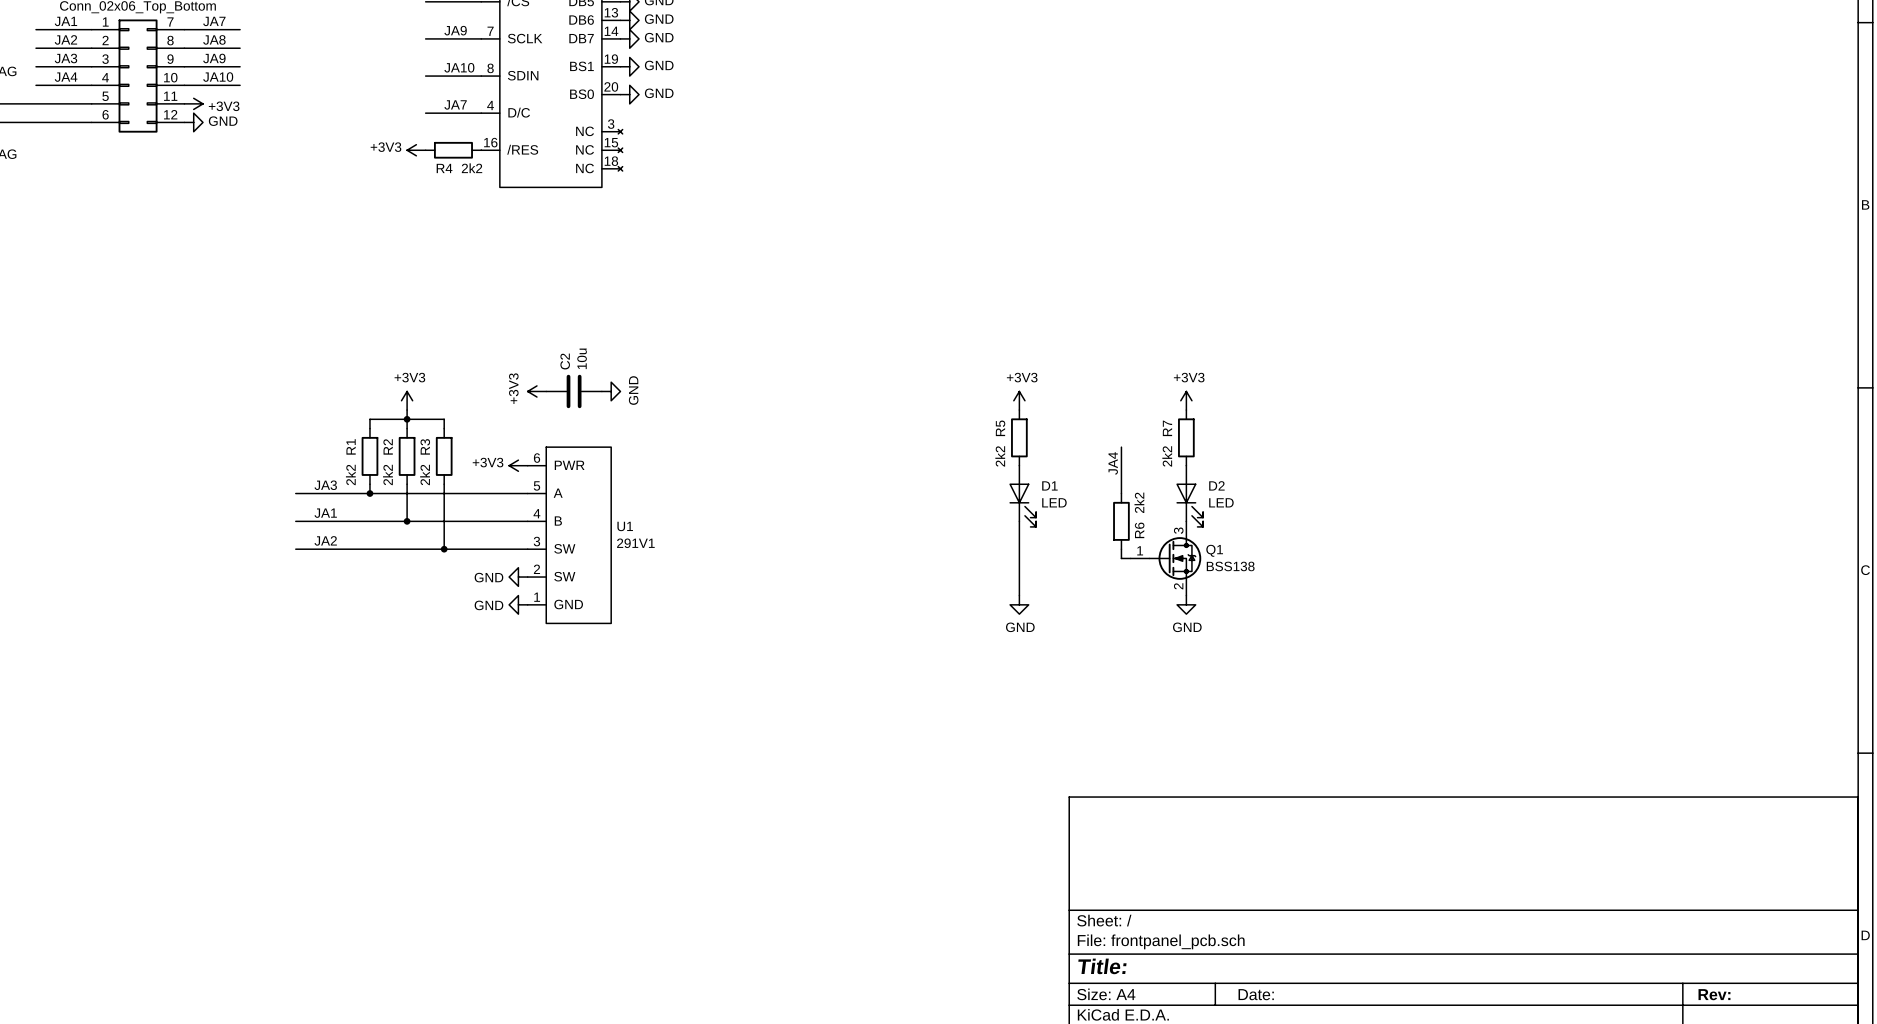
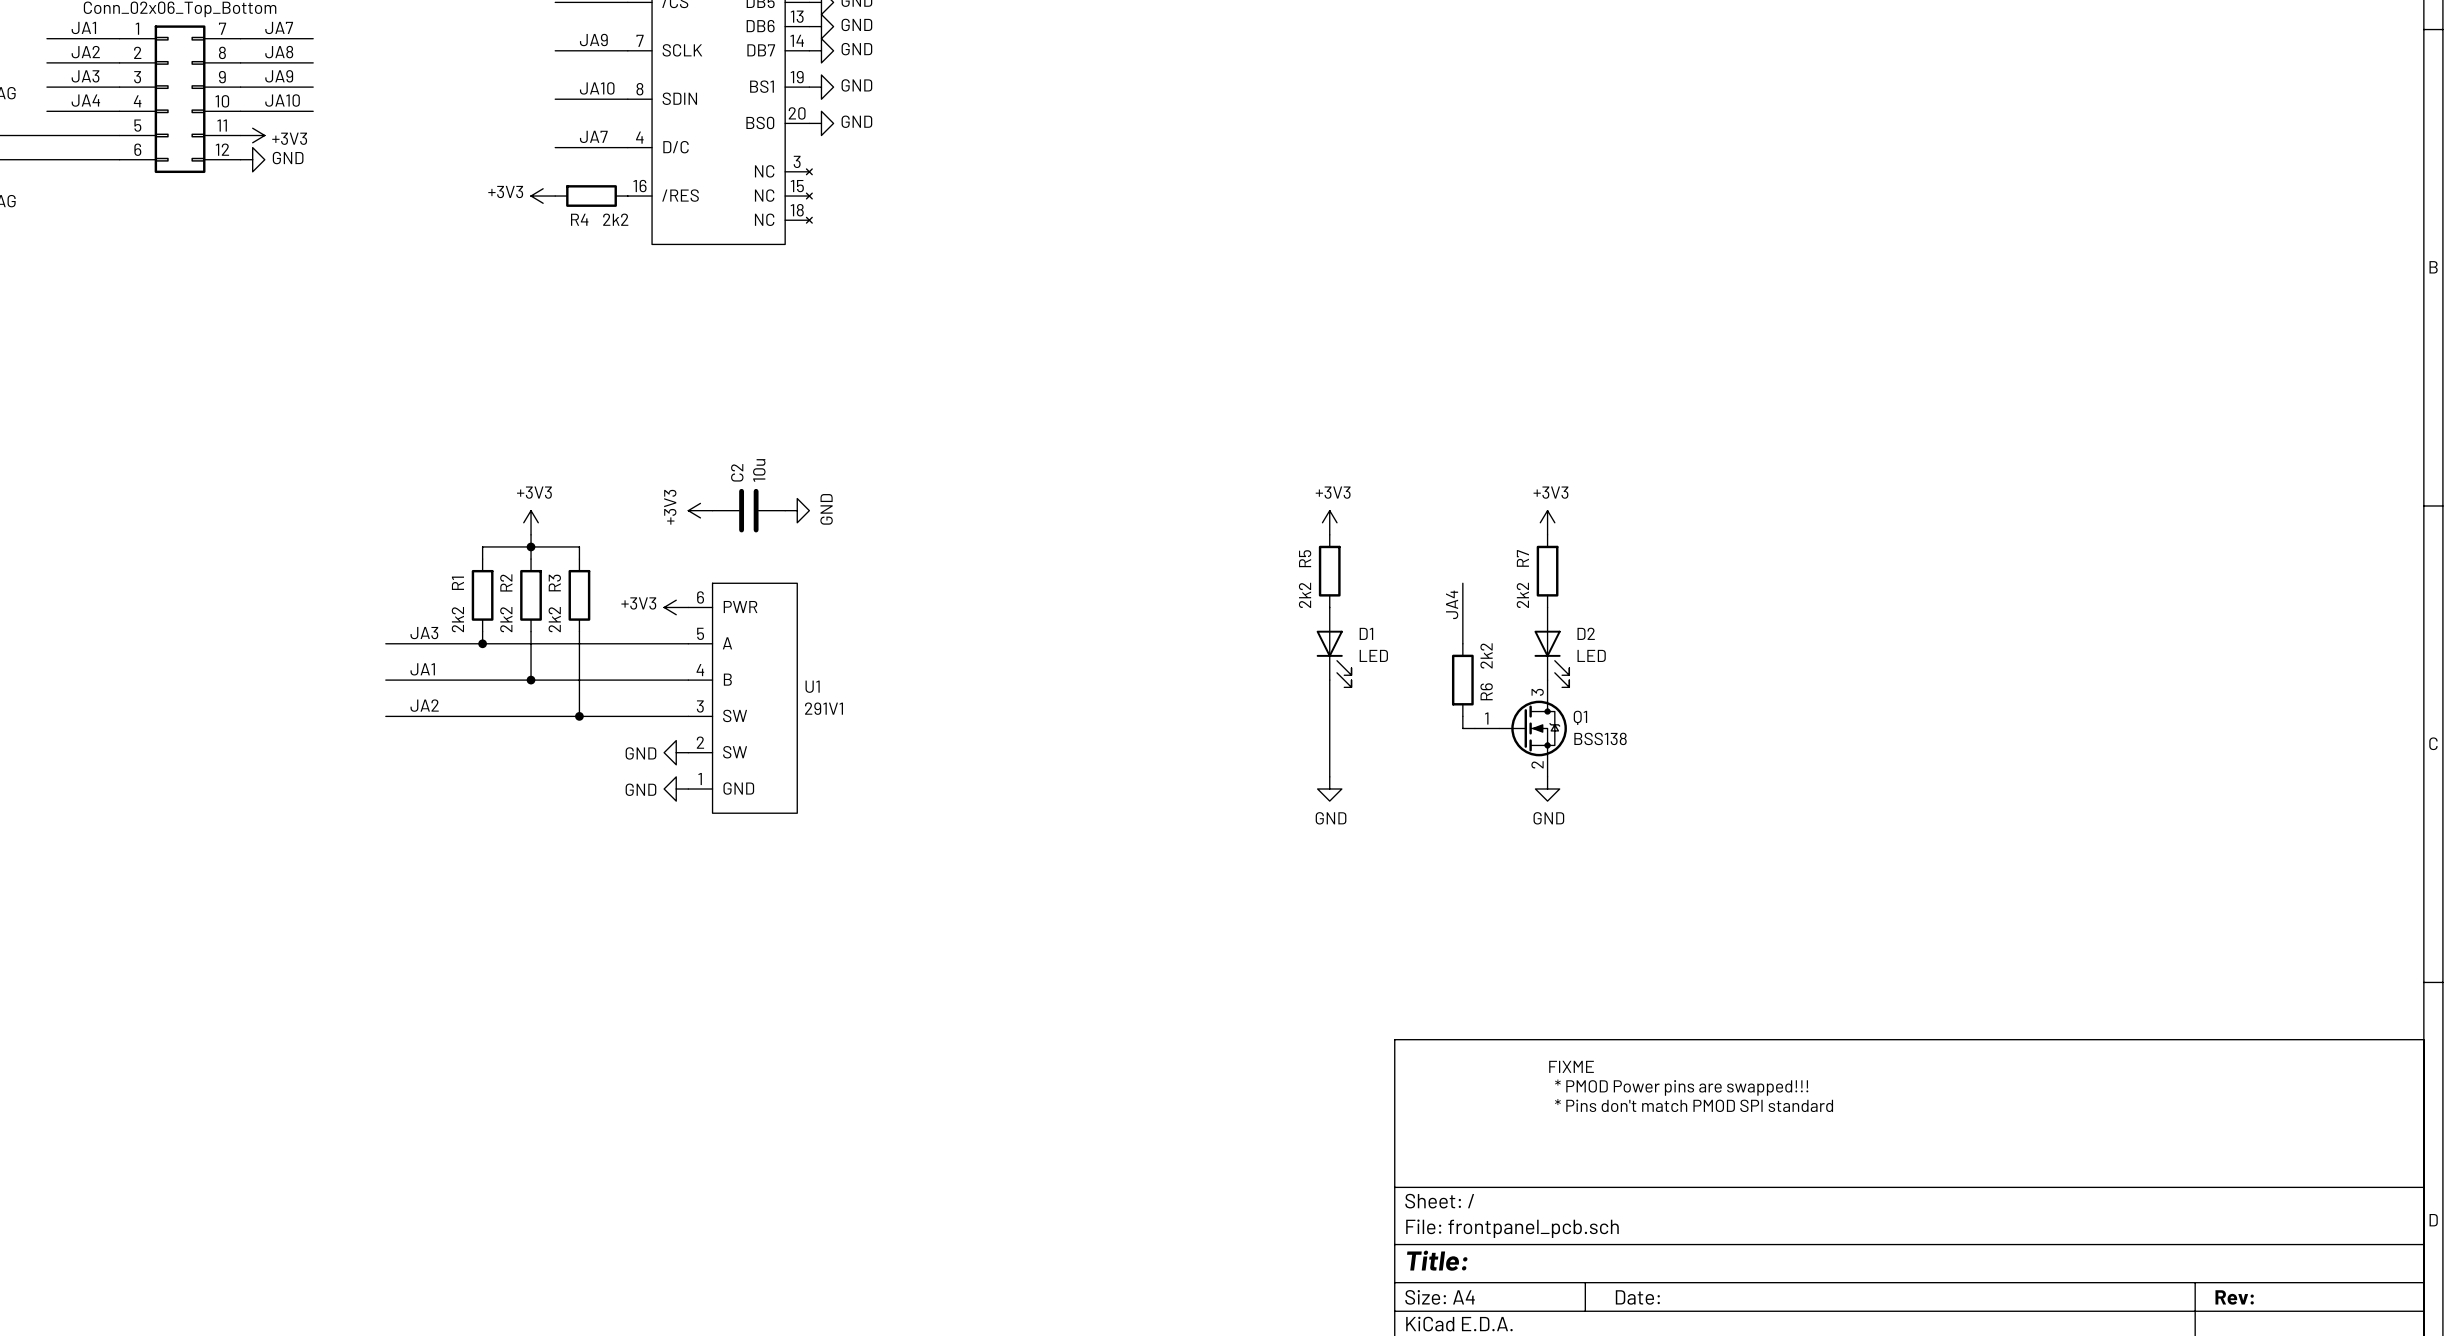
text: none -> FIXME (1571, 1066)
text: none -> * PMOD Power pins are swapped!!! (1681, 1087)
text: none -> * Pins don't match PMOD SPI standard (1694, 1105)

